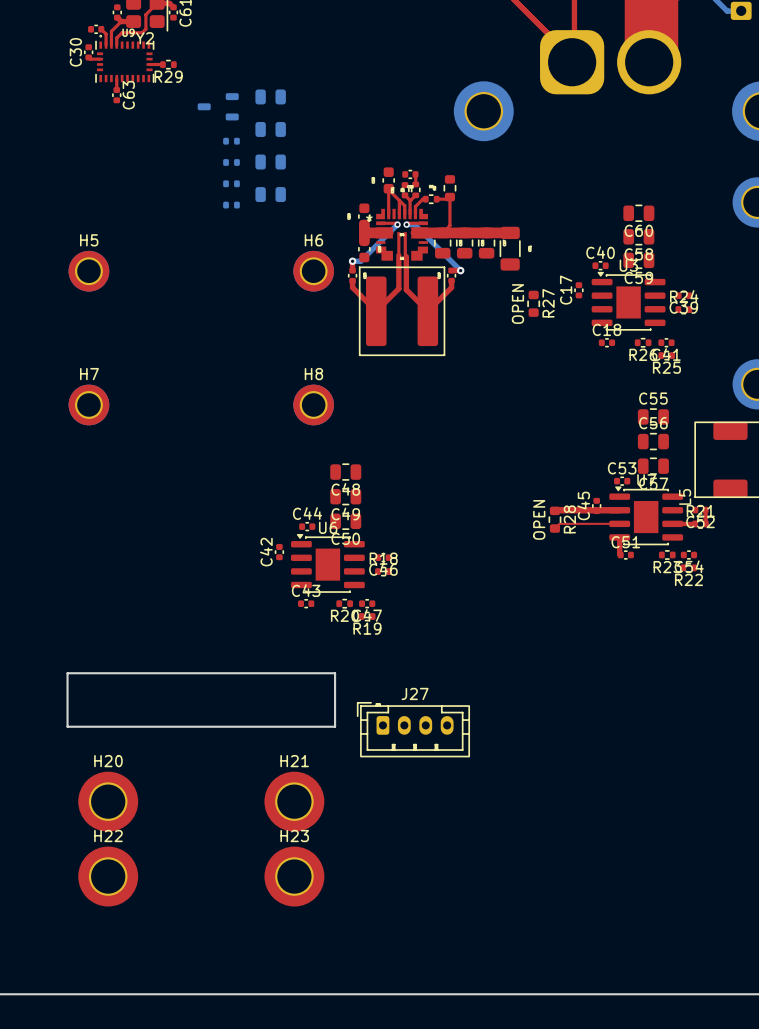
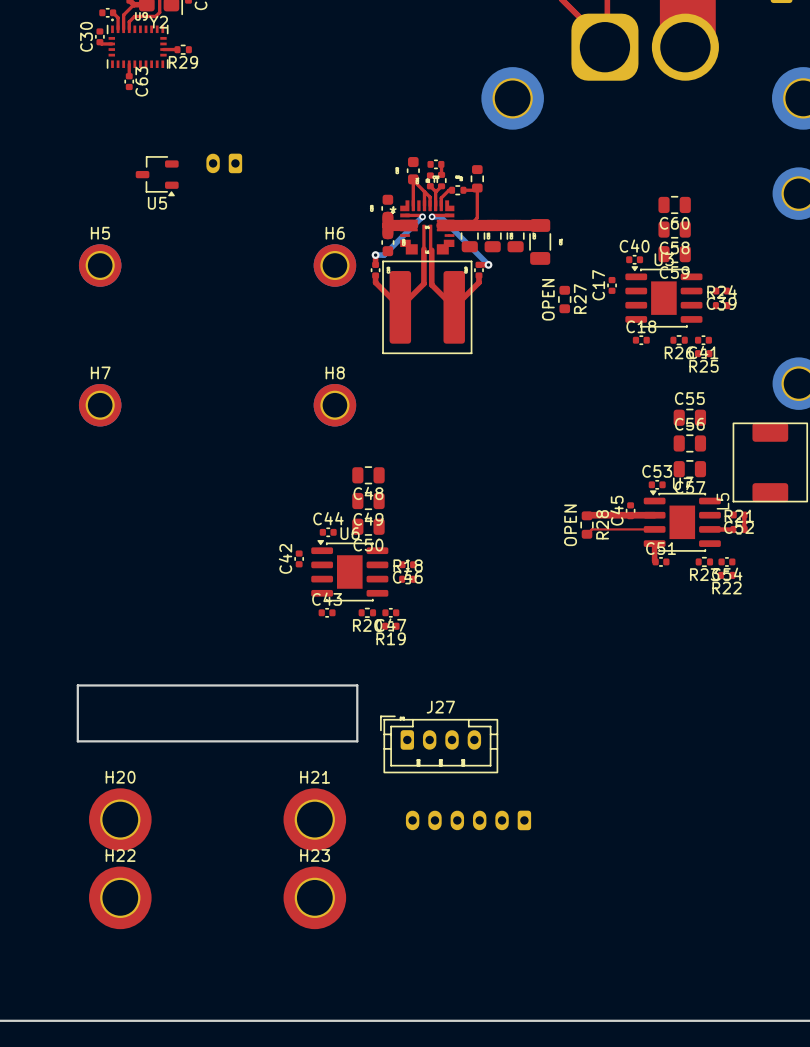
part: (270, 96) -> none
part: (218, 106) -> none
part: (270, 129) -> none
part: (231, 141) -> none
part: (231, 162) -> none
part: (270, 162) -> none
part: none -> (224, 163)
part: (231, 183) -> none
U5: none -> (157, 176)
part: (270, 194) -> none
part: (231, 205) -> none
part: none -> (468, 820)

